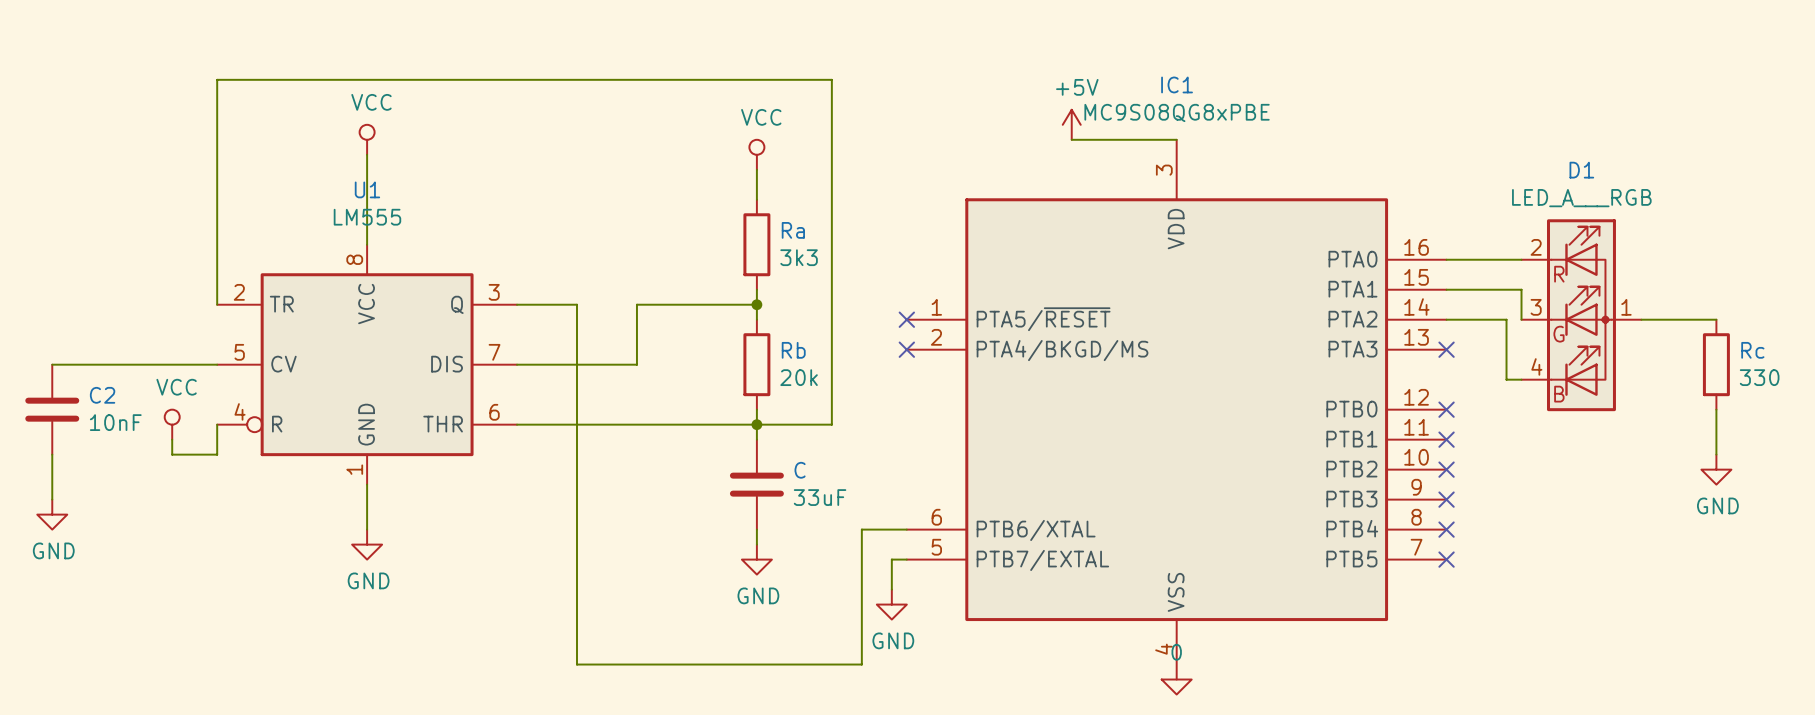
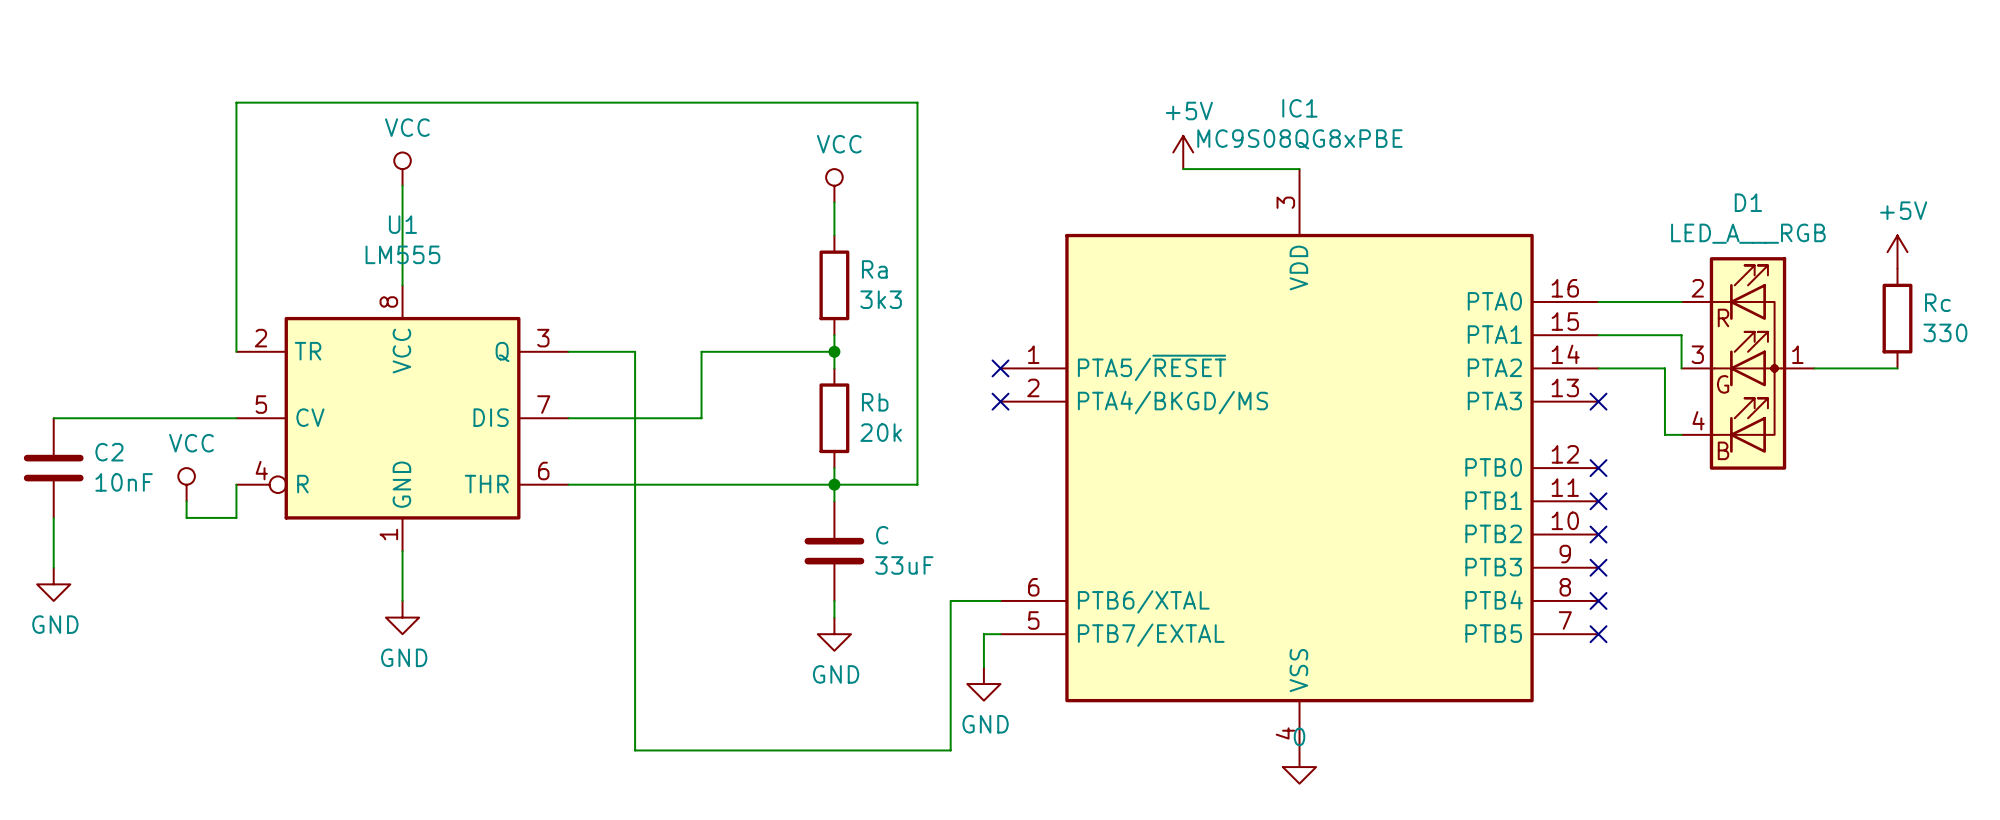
power symbol: none -> +5V (1897, 252)
Rc position: (1716, 364) -> (1897, 318)
wire: (1716, 409) (1716, 454) -> none
power symbol: GND (1716, 469) -> none

